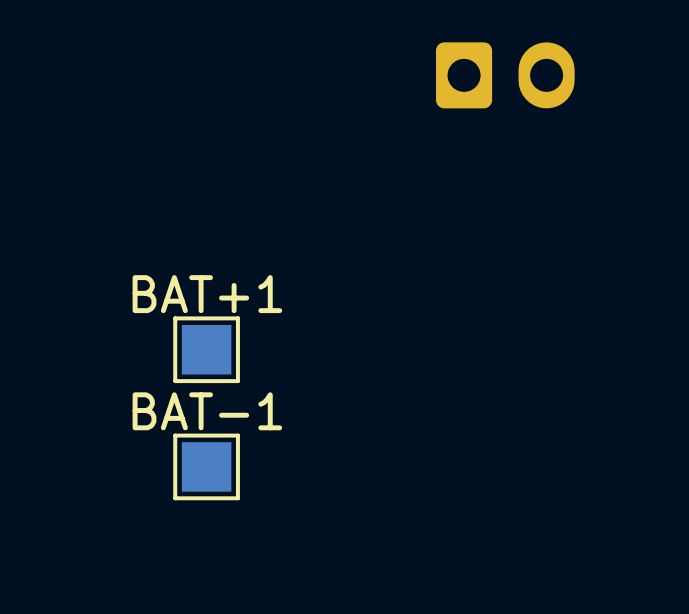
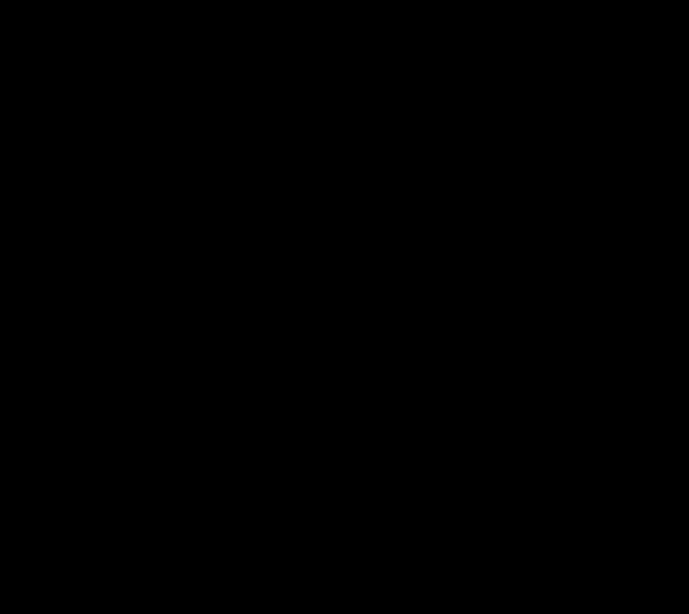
part: (505, 75) -> none
BAT+1: (206, 349) -> none
BAT-1: (206, 466) -> none

